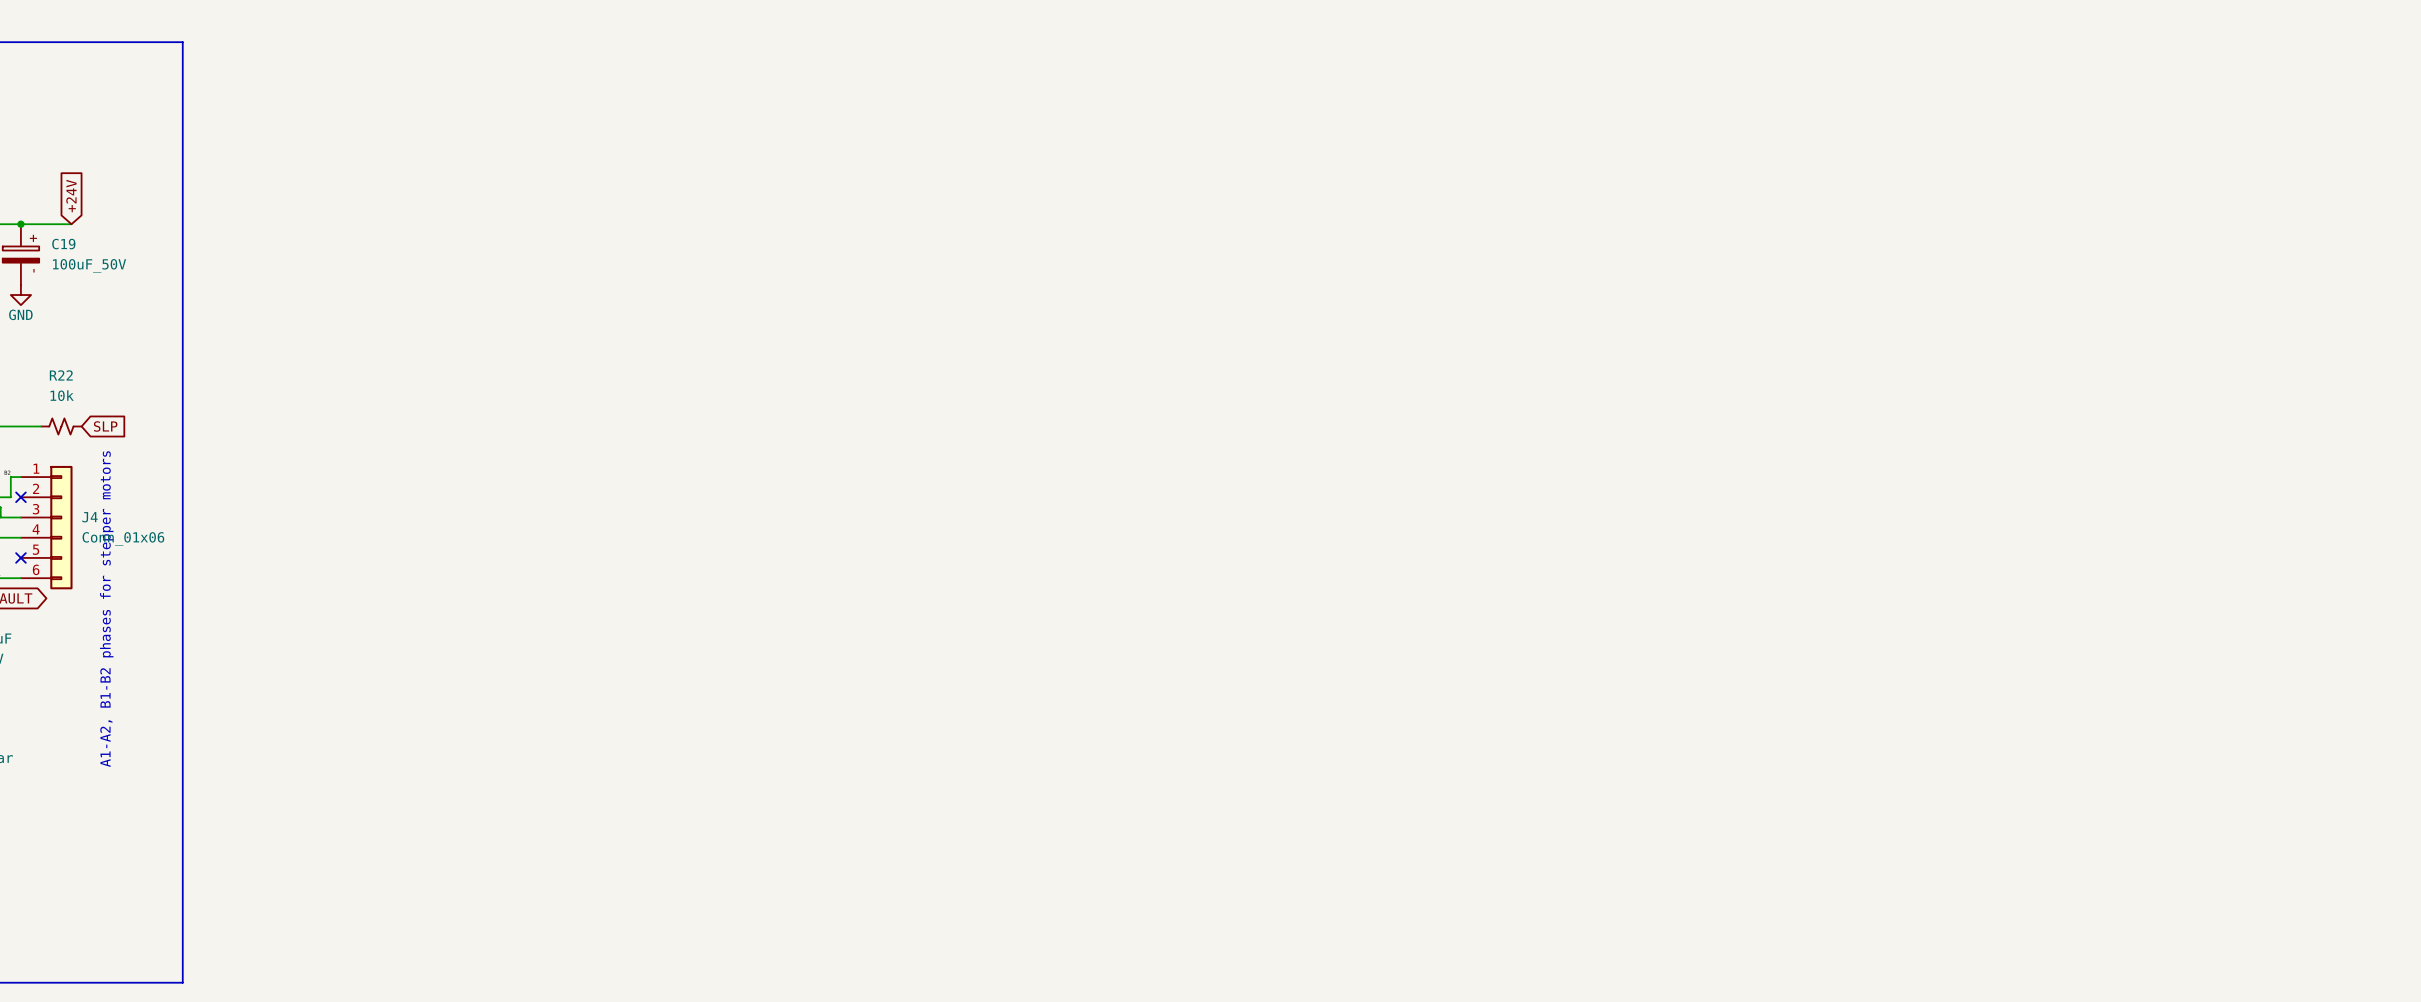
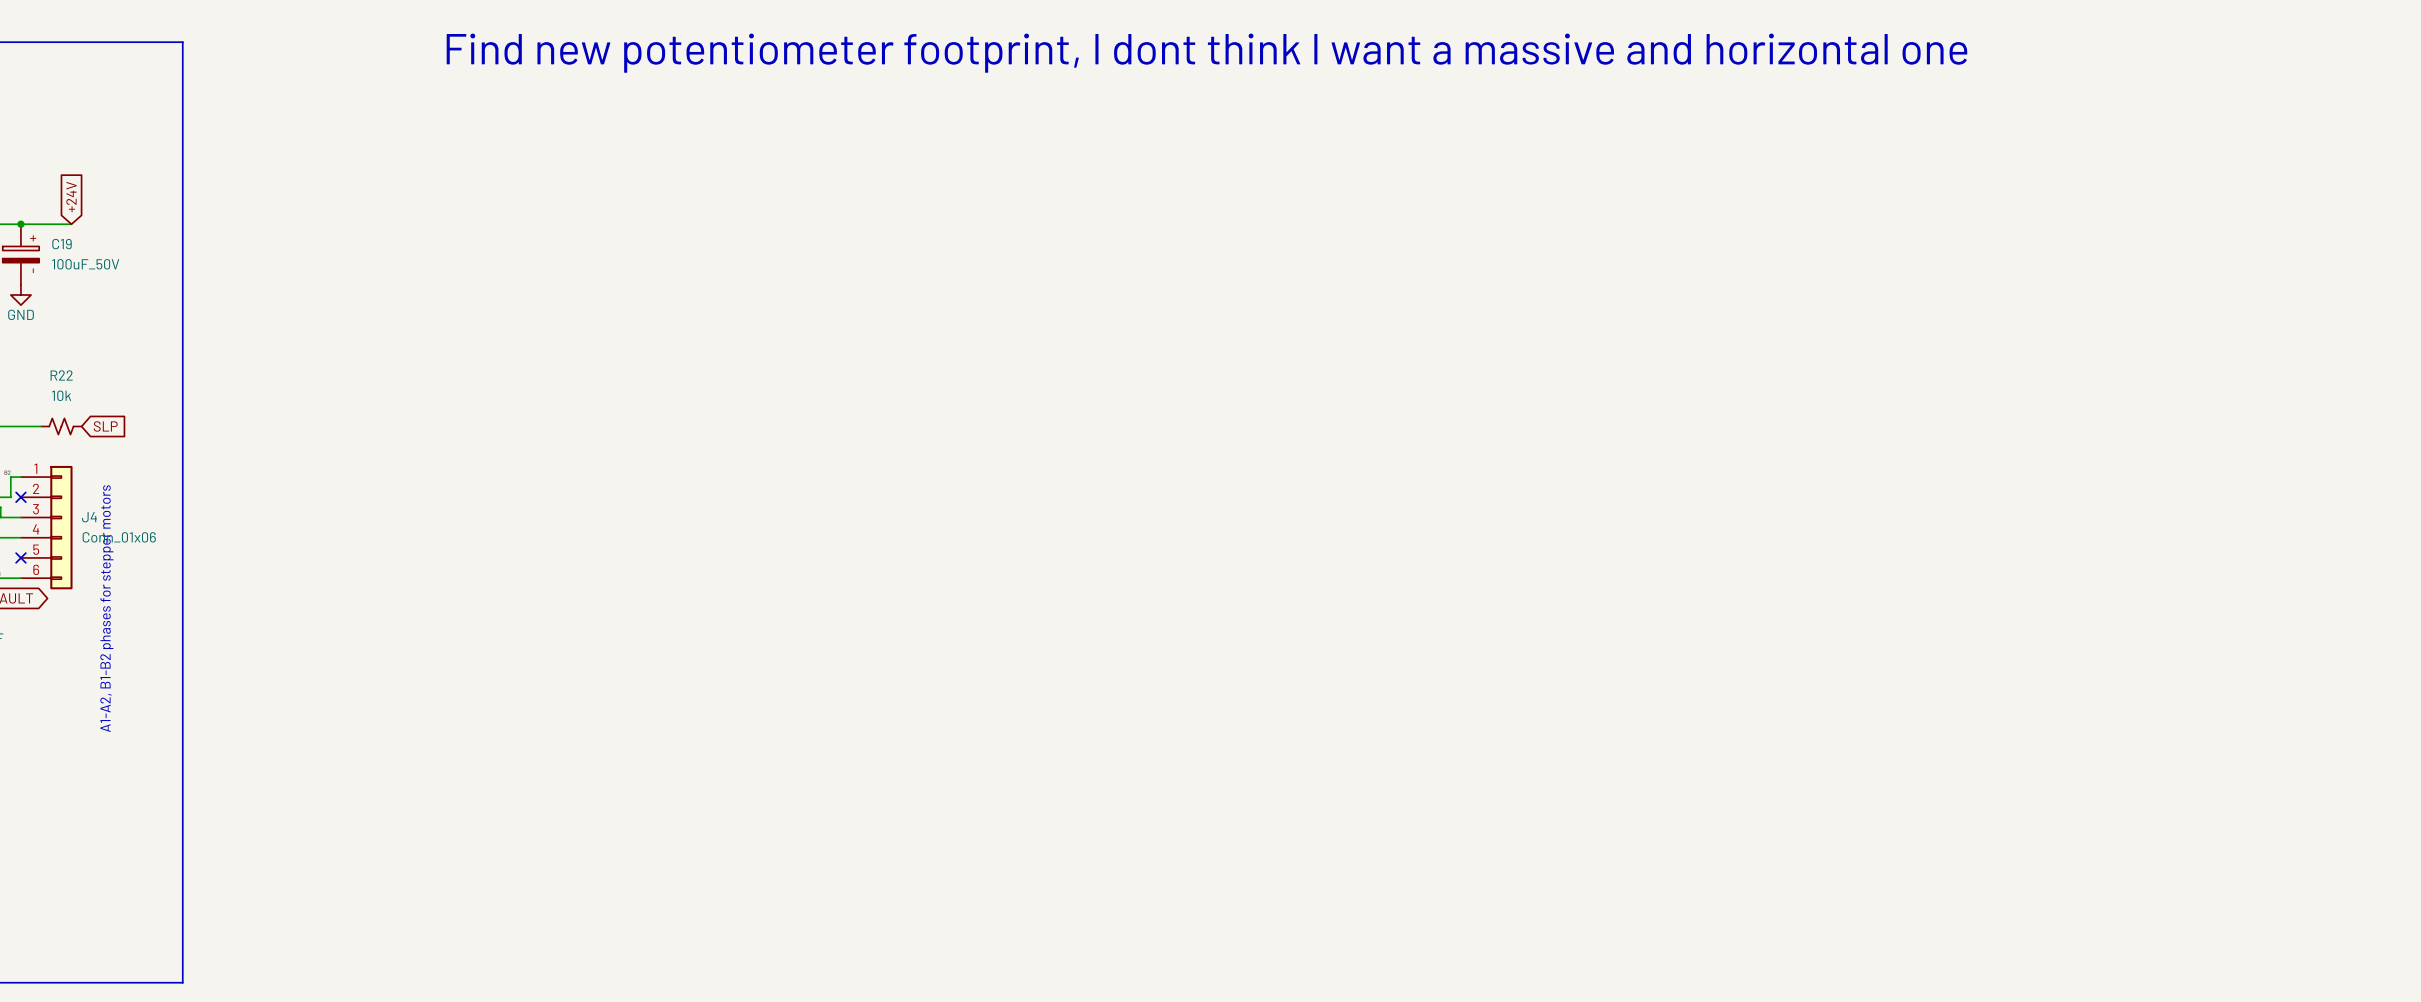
text: none -> Find new potentiometer footprint, I dont think I want a massive and horizontal one (1206, 53)

